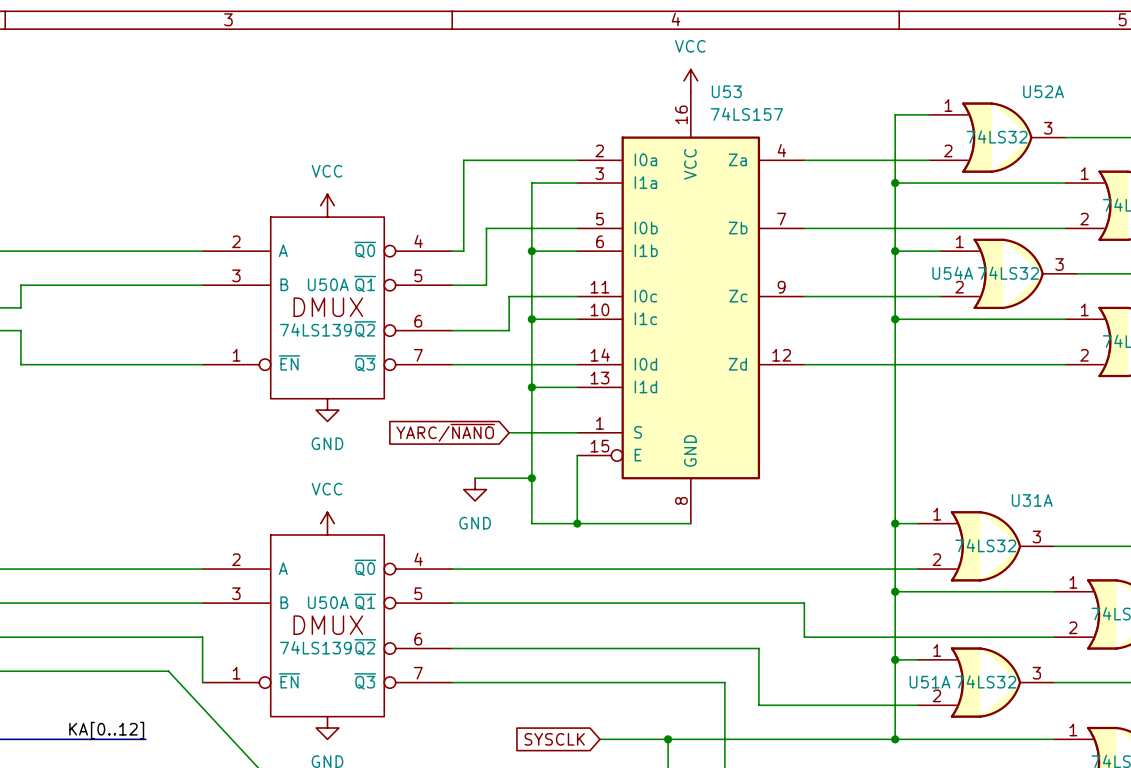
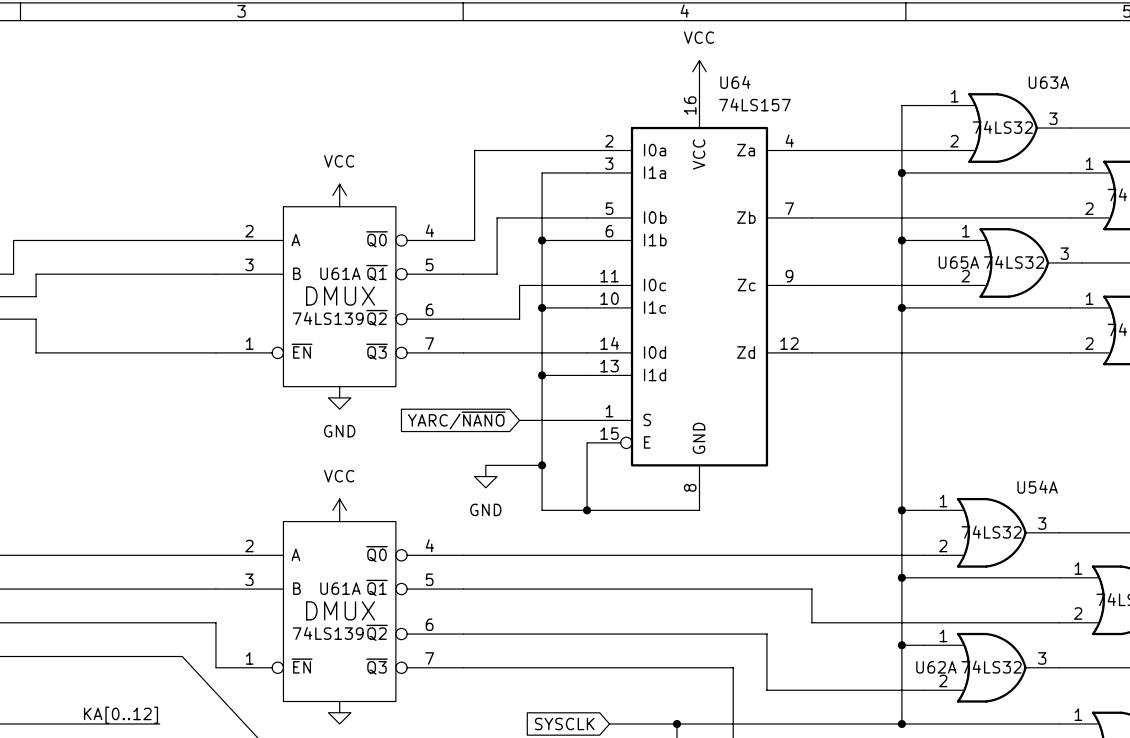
U53 name: U53 (726, 91) -> U64 (735, 82)
U52A name: U52A (1043, 91) -> U63A (1048, 82)
U54A name: U54A (952, 273) -> U65A (958, 262)
U50A name: U50A (328, 284) -> U61A (340, 273)
U31A name: U31A (1032, 500) -> U54A (1037, 487)
U50A name: U50A (328, 602) -> U61A (340, 588)
U51A name: U51A (930, 682) -> U62A (936, 667)

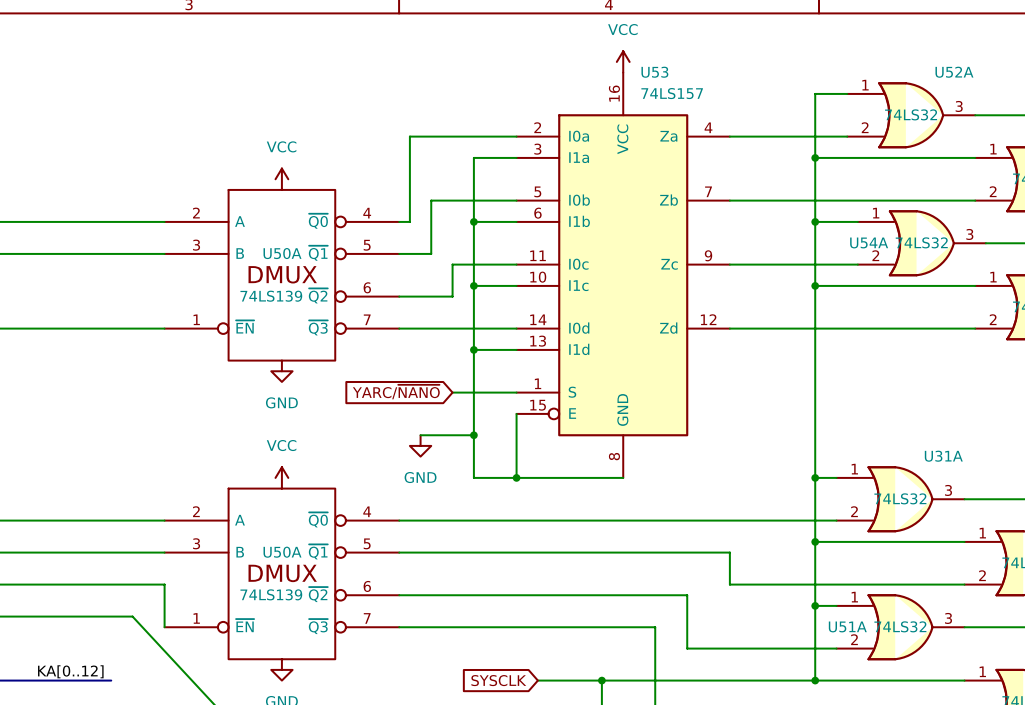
U64 name: U64 (735, 82) -> U53 (654, 72)
U63A name: U63A (1048, 82) -> U52A (954, 72)
U65A name: U65A (958, 262) -> U54A (869, 242)
U61A name: U61A (340, 273) -> U50A (282, 253)
U54A name: U54A (1037, 487) -> U31A (943, 456)
U61A name: U61A (340, 588) -> U50A (282, 552)
U62A name: U62A (936, 667) -> U51A (847, 626)

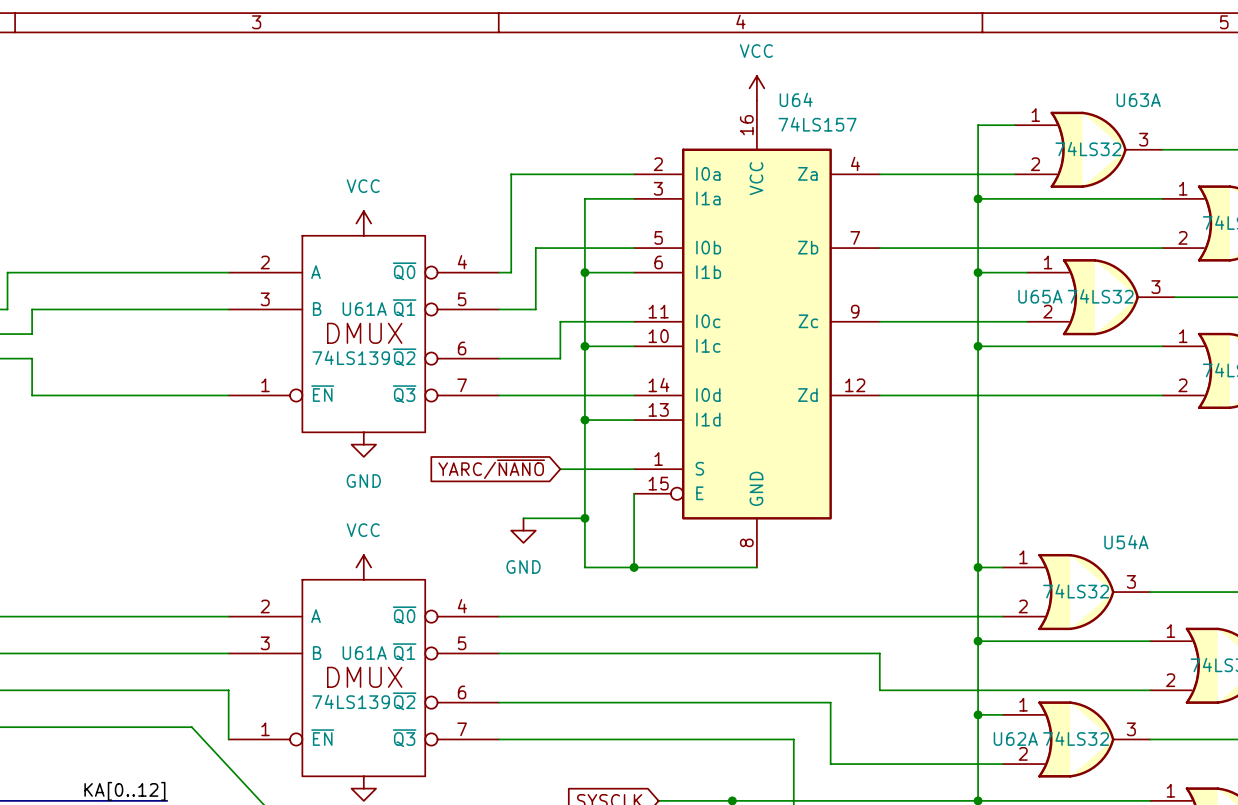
U53 name: U53 (654, 72) -> U64 (796, 99)
U52A name: U52A (954, 72) -> U63A (1138, 100)
U54A name: U54A (869, 242) -> U65A (1040, 296)
U50A name: U50A (282, 253) -> U61A (364, 309)
U31A name: U31A (943, 456) -> U54A (1126, 542)
U50A name: U50A (282, 552) -> U61A (364, 653)
U51A name: U51A (847, 626) -> U62A (1015, 739)

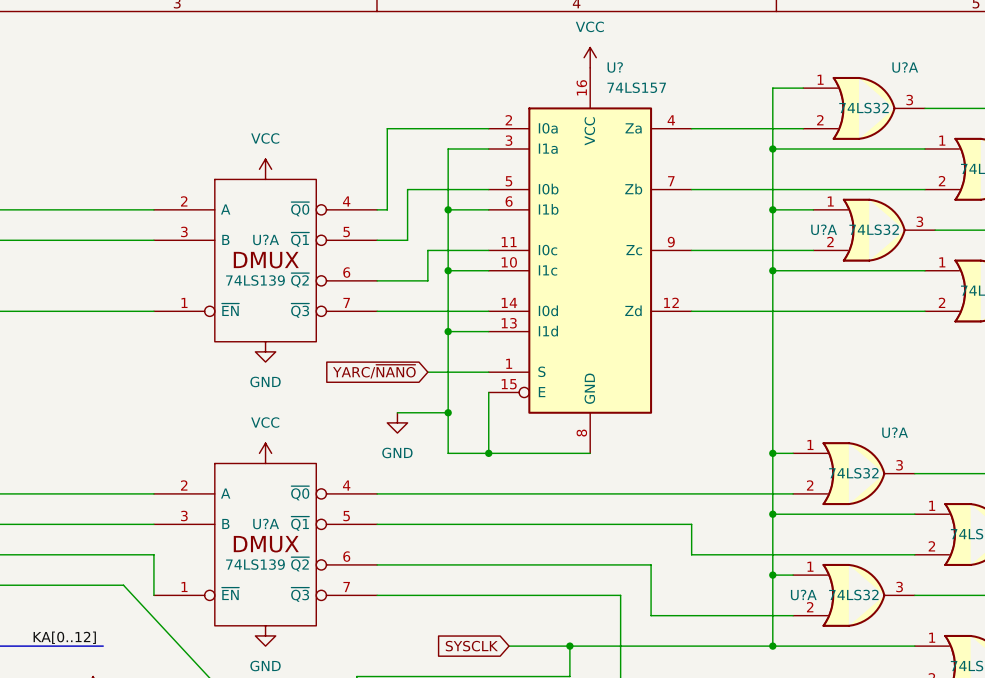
U64 name: U64 (796, 99) -> U? (615, 67)
U63A name: U63A (1138, 100) -> U?A (905, 67)
U65A name: U65A (1040, 296) -> U?A (824, 229)
U61A name: U61A (364, 309) -> U?A (266, 239)
U54A name: U54A (1126, 542) -> U?A (895, 432)
U61A name: U61A (364, 653) -> U?A (266, 523)
U62A name: U62A (1015, 739) -> U?A (803, 595)

